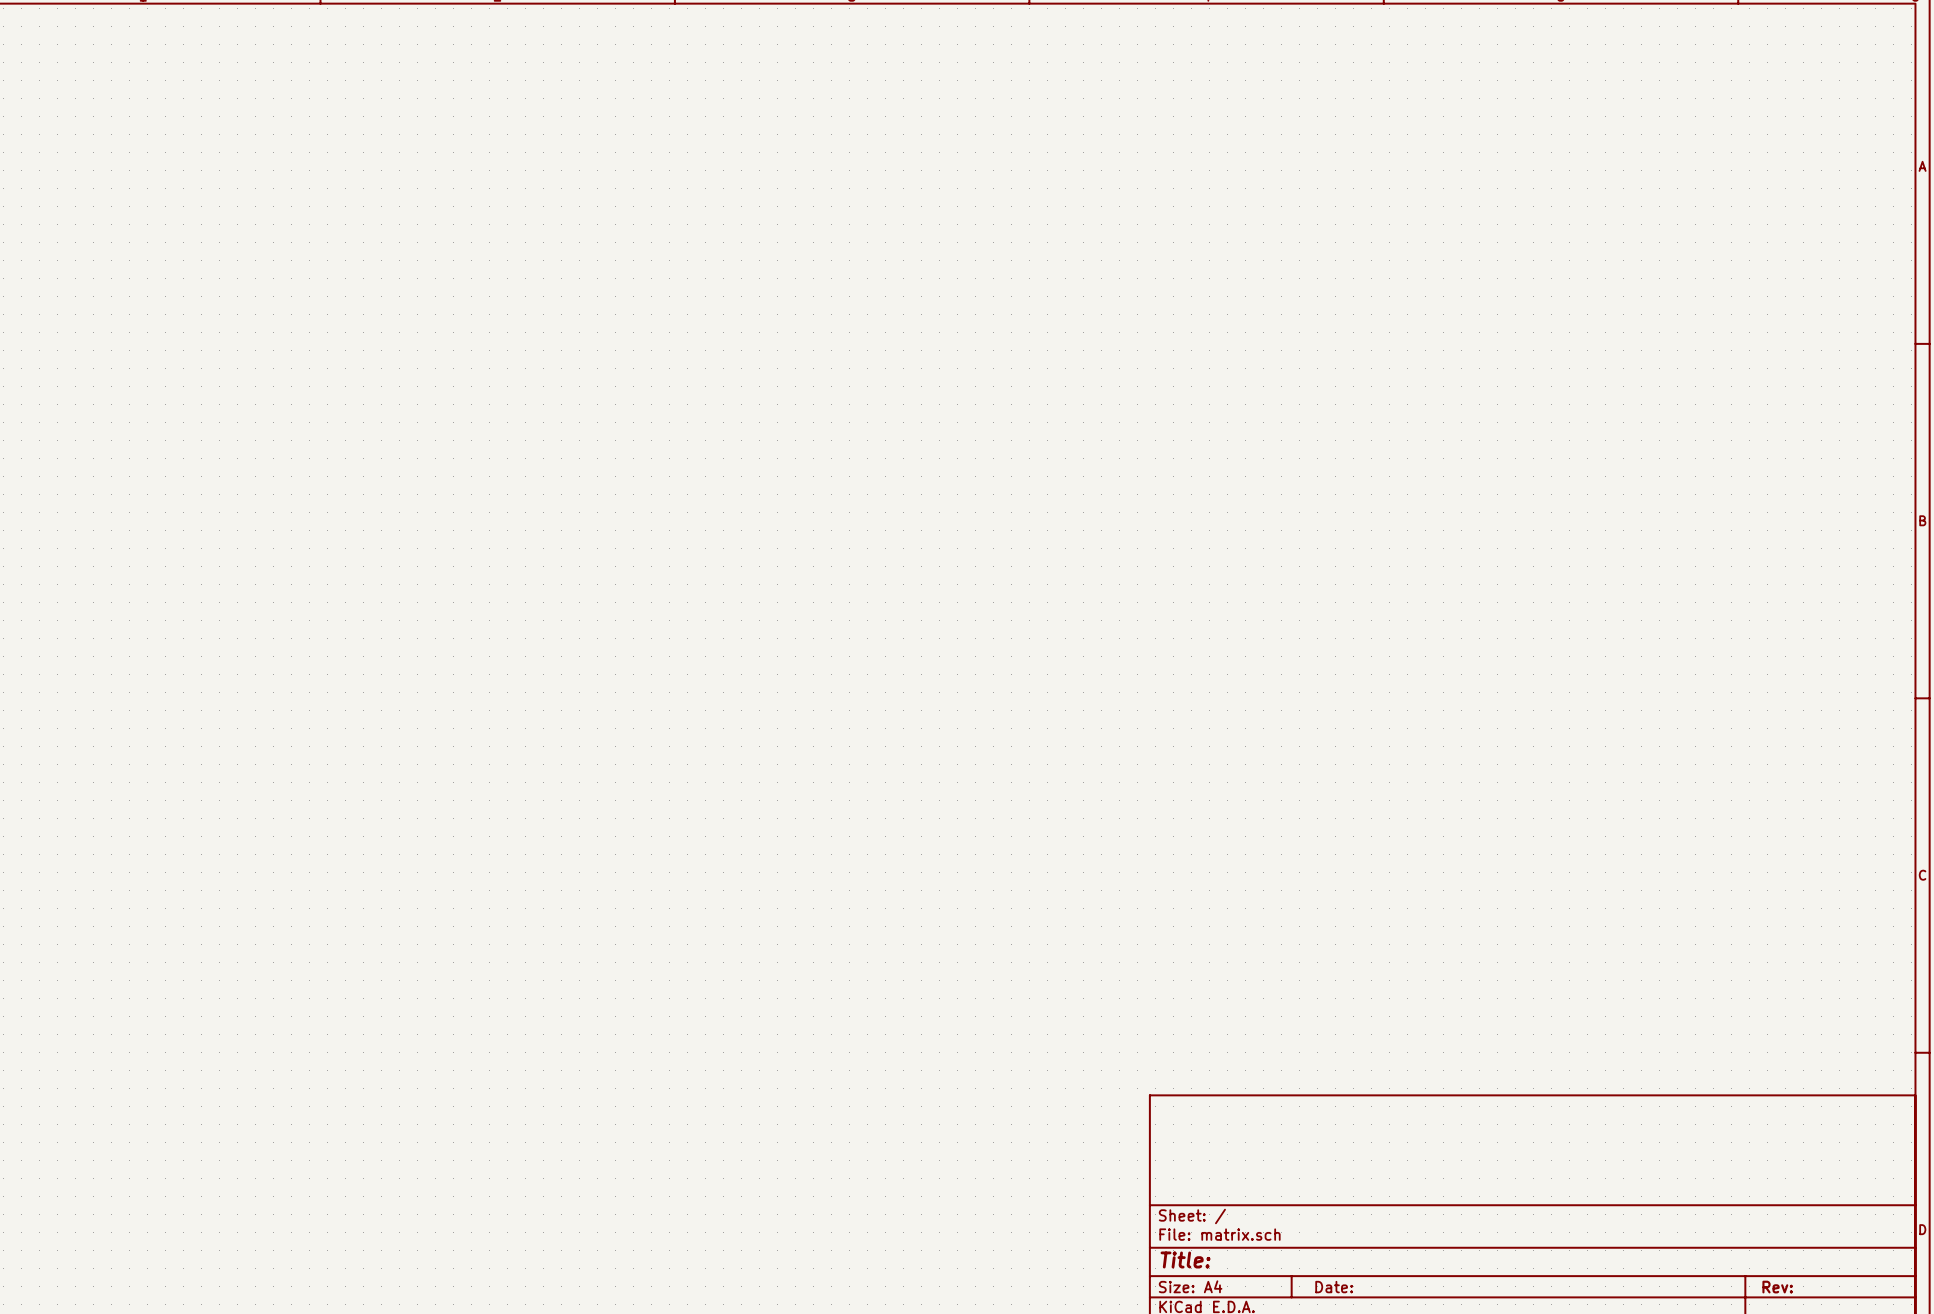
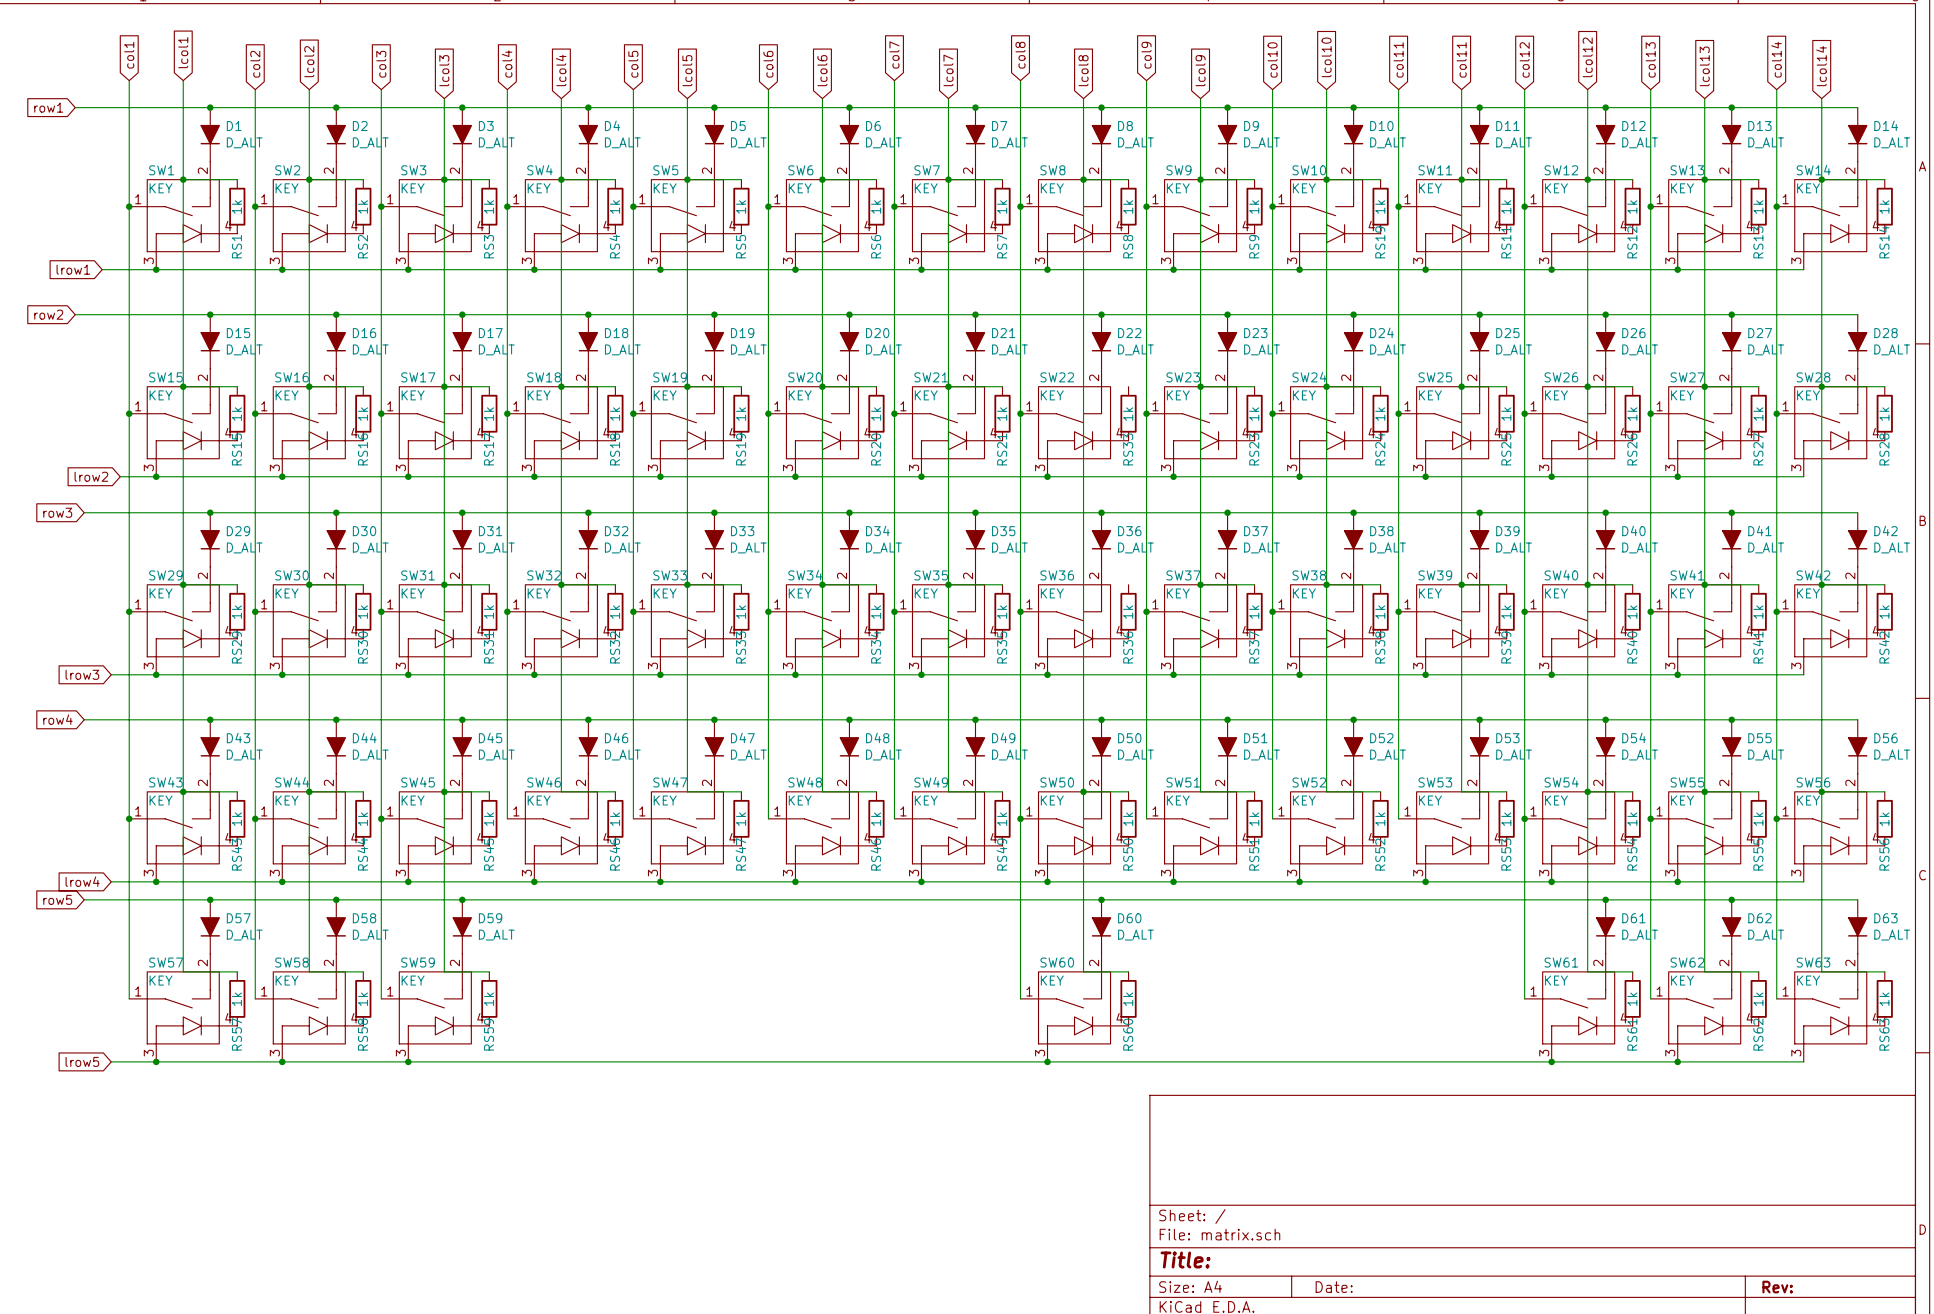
global label: none -> lcol1 (183, 52)
global label: none -> col7 (894, 54)
global label: none -> col1 (129, 55)
global label: none -> col8 (1020, 55)
global label: none -> col9 (1146, 55)
global label: none -> lcol10 (1326, 57)
global label: none -> lcol12 (1587, 57)
global label: none -> col10 (1272, 59)
global label: none -> col11 (1398, 59)
global label: none -> col11 (1461, 59)
global label: none -> col12 (1524, 59)
global label: none -> col13 (1650, 59)
global label: none -> col14 (1776, 59)
global label: none -> lcol2 (309, 61)
global label: none -> col2 (255, 64)
global label: none -> col3 (381, 64)
global label: none -> col4 (507, 64)
global label: none -> col5 (633, 64)
global label: none -> col6 (768, 64)
global label: none -> lcol13 (1704, 66)
global label: none -> lcol14 (1821, 66)
global label: none -> lcol3 (444, 70)
global label: none -> lcol4 (561, 70)
global label: none -> lcol5 (687, 70)
global label: none -> lcol6 (822, 70)
global label: none -> lcol7 (948, 70)
global label: none -> lcol8 (1083, 70)
global label: none -> lcol9 (1200, 70)
wire: none -> (129, 80) (129, 998)
wire: none -> (183, 80) (183, 971) (237, 971)
wire: none -> (894, 80) (894, 818)
wire: none -> (1020, 80) (1020, 998)
wire: none -> (1146, 80) (1146, 818)
wire: none -> (255, 89) (255, 998)
wire: none -> (309, 89) (309, 971) (363, 971)
wire: none -> (381, 89) (381, 998)
wire: none -> (507, 89) (507, 818)
wire: none -> (633, 89) (633, 818)
wire: none -> (768, 89) (768, 818)
wire: none -> (1272, 89) (1272, 818)
wire: none -> (1326, 89) (1326, 791) (1380, 791)
wire: none -> (1398, 89) (1398, 818)
wire: none -> (1461, 89) (1461, 791) (1506, 791)
wire: none -> (1524, 89) (1524, 998)
wire: none -> (1587, 89) (1587, 971) (1632, 971)
wire: none -> (1650, 89) (1650, 998)
wire: none -> (1776, 89) (1776, 998)
wire: none -> (444, 98) (444, 971) (489, 971)
wire: none -> (561, 98) (561, 791) (615, 791)
wire: none -> (687, 98) (687, 791) (741, 791)
wire: none -> (822, 98) (822, 791) (876, 791)
wire: none -> (948, 98) (948, 791) (1002, 791)
wire: none -> (1083, 98) (1083, 971) (1128, 971)
wire: none -> (1200, 98) (1200, 791) (1254, 791)
wire: none -> (1704, 98) (1704, 971) (1758, 971)
wire: none -> (1821, 98) (1821, 971) (1884, 971)
global label: none -> row1 (48, 107)
wire: none -> (75, 107) (1857, 107)
junction: none -> (210, 107)
junction: none -> (336, 107)
junction: none -> (462, 107)
junction: none -> (588, 107)
junction: none -> (714, 107)
junction: none -> (849, 107)
junction: none -> (975, 107)
junction: none -> (1101, 107)
junction: none -> (1227, 107)
junction: none -> (1353, 107)
junction: none -> (1479, 107)
junction: none -> (1605, 107)
junction: none -> (1731, 107)
D1: none -> D_ALT (210, 134)
D2: none -> D_ALT (336, 134)
D3: none -> D_ALT (462, 134)
D4: none -> D_ALT (588, 134)
D5: none -> D_ALT (714, 134)
D6: none -> D_ALT (849, 134)
D7: none -> D_ALT (975, 134)
D8: none -> D_ALT (1101, 134)
D9: none -> D_ALT (1227, 134)
D10: none -> D_ALT (1353, 134)
D11: none -> D_ALT (1479, 134)
D12: none -> D_ALT (1605, 134)
D13: none -> D_ALT (1731, 134)
D14: none -> D_ALT (1857, 134)
wire: none -> (183, 179) (237, 179)
junction: none -> (183, 179)
wire: none -> (309, 179) (363, 179)
junction: none -> (309, 179)
wire: none -> (444, 179) (489, 179)
junction: none -> (444, 179)
wire: none -> (561, 179) (615, 179)
junction: none -> (561, 179)
wire: none -> (687, 179) (741, 179)
junction: none -> (687, 179)
wire: none -> (822, 179) (876, 179)
junction: none -> (822, 179)
wire: none -> (948, 179) (1002, 179)
junction: none -> (948, 179)
wire: none -> (1083, 179) (1128, 179)
junction: none -> (1083, 179)
wire: none -> (1200, 179) (1254, 179)
junction: none -> (1200, 179)
wire: none -> (1326, 179) (1380, 179)
junction: none -> (1326, 179)
wire: none -> (1461, 179) (1506, 179)
junction: none -> (1461, 179)
wire: none -> (1587, 179) (1632, 179)
junction: none -> (1587, 179)
wire: none -> (1704, 179) (1758, 179)
junction: none -> (1704, 179)
wire: none -> (1821, 179) (1884, 179)
junction: none -> (1821, 179)
junction: none -> (129, 206)
RS1: none -> 1k (237, 206)
junction: none -> (255, 206)
RS2: none -> 1k (363, 206)
junction: none -> (381, 206)
RS3: none -> 1k (489, 206)
junction: none -> (507, 206)
RS4: none -> 1k (615, 206)
junction: none -> (633, 206)
RS5: none -> 1k (741, 206)
junction: none -> (768, 206)
RS6: none -> 1k (876, 206)
junction: none -> (894, 206)
RS7: none -> 1k (1002, 206)
junction: none -> (1020, 206)
RS8: none -> 1k (1128, 206)
junction: none -> (1146, 206)
RS9: none -> 1k (1254, 206)
junction: none -> (1272, 206)
RS19: none -> 1k (1380, 206)
junction: none -> (1398, 206)
RS11: none -> 1k (1506, 206)
junction: none -> (1524, 206)
RS12: none -> 1k (1632, 206)
junction: none -> (1650, 206)
RS13: none -> 1k (1758, 206)
junction: none -> (1776, 206)
RS14: none -> 1k (1884, 206)
SW1: none -> KEY (183, 215)
SW2: none -> KEY (309, 215)
SW3: none -> KEY (435, 215)
SW4: none -> KEY (561, 215)
SW5: none -> KEY (687, 215)
SW6: none -> KEY (822, 215)
SW7: none -> KEY (948, 215)
SW8: none -> KEY (1074, 215)
SW9: none -> KEY (1200, 215)
SW10: none -> KEY (1326, 215)
SW11: none -> KEY (1452, 215)
SW12: none -> KEY (1578, 215)
SW13: none -> KEY (1704, 215)
SW14: none -> KEY (1830, 215)
global label: none -> lrow1 (73, 269)
wire: none -> (102, 269) (1803, 269)
junction: none -> (156, 269)
junction: none -> (282, 269)
junction: none -> (408, 269)
junction: none -> (534, 269)
junction: none -> (660, 269)
junction: none -> (795, 269)
junction: none -> (921, 269)
junction: none -> (1047, 269)
junction: none -> (1173, 269)
junction: none -> (1299, 269)
junction: none -> (1425, 269)
junction: none -> (1551, 269)
junction: none -> (1677, 269)
global label: none -> row2 (48, 314)
wire: none -> (75, 314) (1857, 314)
junction: none -> (210, 314)
junction: none -> (336, 314)
junction: none -> (462, 314)
junction: none -> (588, 314)
junction: none -> (714, 314)
junction: none -> (849, 314)
junction: none -> (975, 314)
junction: none -> (1101, 314)
junction: none -> (1227, 314)
junction: none -> (1353, 314)
junction: none -> (1479, 314)
junction: none -> (1605, 314)
junction: none -> (1731, 314)
D15: none -> D_ALT (210, 341)
D16: none -> D_ALT (336, 341)
D17: none -> D_ALT (462, 341)
D18: none -> D_ALT (588, 341)
D19: none -> D_ALT (714, 341)
D20: none -> D_ALT (849, 341)
D21: none -> D_ALT (975, 341)
D22: none -> D_ALT (1101, 341)
D23: none -> D_ALT (1227, 341)
D24: none -> D_ALT (1353, 341)
D25: none -> D_ALT (1479, 341)
D26: none -> D_ALT (1605, 341)
D27: none -> D_ALT (1731, 341)
D28: none -> D_ALT (1857, 341)
wire: none -> (183, 386) (237, 386)
junction: none -> (183, 386)
wire: none -> (309, 386) (363, 386)
junction: none -> (309, 386)
wire: none -> (444, 386) (489, 386)
junction: none -> (444, 386)
wire: none -> (561, 386) (615, 386)
junction: none -> (561, 386)
wire: none -> (687, 386) (741, 386)
junction: none -> (687, 386)
wire: none -> (822, 386) (876, 386)
junction: none -> (822, 386)
wire: none -> (948, 386) (1002, 386)
junction: none -> (948, 386)
wire: none -> (1200, 386) (1254, 386)
junction: none -> (1200, 386)
wire: none -> (1326, 386) (1380, 386)
junction: none -> (1326, 386)
wire: none -> (1461, 386) (1506, 386)
junction: none -> (1461, 386)
wire: none -> (1587, 386) (1632, 386)
junction: none -> (1587, 386)
wire: none -> (1704, 386) (1758, 386)
junction: none -> (1704, 386)
wire: none -> (1821, 386) (1884, 386)
junction: none -> (1821, 386)
junction: none -> (129, 413)
RS15: none -> 1k (237, 413)
junction: none -> (255, 413)
RS16: none -> 1k (363, 413)
junction: none -> (381, 413)
RS17: none -> 1k (489, 413)
junction: none -> (507, 413)
RS18: none -> 1k (615, 413)
junction: none -> (633, 413)
RS19: none -> 1k (741, 413)
junction: none -> (768, 413)
RS20: none -> 1k (876, 413)
junction: none -> (894, 413)
RS21: none -> 1k (1002, 413)
junction: none -> (1020, 413)
RS33: none -> 1k (1128, 413)
junction: none -> (1146, 413)
RS23: none -> 1k (1254, 413)
junction: none -> (1272, 413)
RS24: none -> 1k (1380, 413)
junction: none -> (1398, 413)
RS25: none -> 1k (1506, 413)
junction: none -> (1524, 413)
RS26: none -> 1k (1632, 413)
junction: none -> (1650, 413)
RS27: none -> 1k (1758, 413)
junction: none -> (1776, 413)
RS28: none -> 1k (1884, 413)
SW15: none -> KEY (183, 422)
SW16: none -> KEY (309, 422)
SW17: none -> KEY (435, 422)
SW18: none -> KEY (561, 422)
SW19: none -> KEY (687, 422)
SW20: none -> KEY (822, 422)
SW21: none -> KEY (948, 422)
SW22: none -> KEY (1074, 422)
SW23: none -> KEY (1200, 422)
SW24: none -> KEY (1326, 422)
SW25: none -> KEY (1452, 422)
SW26: none -> KEY (1578, 422)
SW27: none -> KEY (1704, 422)
SW28: none -> KEY (1830, 422)
global label: none -> lrow2 (91, 476)
wire: none -> (120, 476) (1803, 476)
junction: none -> (156, 476)
junction: none -> (282, 476)
junction: none -> (408, 476)
junction: none -> (534, 476)
junction: none -> (660, 476)
junction: none -> (795, 476)
junction: none -> (921, 476)
junction: none -> (1047, 476)
junction: none -> (1173, 476)
junction: none -> (1299, 476)
junction: none -> (1425, 476)
junction: none -> (1551, 476)
junction: none -> (1677, 476)
global label: none -> row3 (57, 512)
wire: none -> (84, 512) (1857, 512)
junction: none -> (210, 512)
junction: none -> (336, 512)
junction: none -> (462, 512)
junction: none -> (588, 512)
junction: none -> (714, 512)
junction: none -> (849, 512)
junction: none -> (975, 512)
junction: none -> (1101, 512)
junction: none -> (1227, 512)
junction: none -> (1353, 512)
junction: none -> (1479, 512)
junction: none -> (1605, 512)
junction: none -> (1731, 512)
D29: none -> D_ALT (210, 539)
D30: none -> D_ALT (336, 539)
D31: none -> D_ALT (462, 539)
D32: none -> D_ALT (588, 539)
D33: none -> D_ALT (714, 539)
D34: none -> D_ALT (849, 539)
D35: none -> D_ALT (975, 539)
D36: none -> D_ALT (1101, 539)
D37: none -> D_ALT (1227, 539)
D38: none -> D_ALT (1353, 539)
D39: none -> D_ALT (1479, 539)
D40: none -> D_ALT (1605, 539)
D41: none -> D_ALT (1731, 539)
D42: none -> D_ALT (1857, 539)
wire: none -> (183, 584) (237, 584)
junction: none -> (183, 584)
wire: none -> (309, 584) (363, 584)
junction: none -> (309, 584)
wire: none -> (444, 584) (489, 584)
junction: none -> (444, 584)
wire: none -> (561, 584) (615, 584)
junction: none -> (561, 584)
wire: none -> (687, 584) (741, 584)
junction: none -> (687, 584)
wire: none -> (822, 584) (876, 584)
junction: none -> (822, 584)
wire: none -> (948, 584) (1002, 584)
junction: none -> (948, 584)
wire: none -> (1200, 584) (1254, 584)
junction: none -> (1200, 584)
wire: none -> (1326, 584) (1380, 584)
junction: none -> (1326, 584)
wire: none -> (1461, 584) (1506, 584)
junction: none -> (1461, 584)
wire: none -> (1587, 584) (1632, 584)
junction: none -> (1587, 584)
wire: none -> (1704, 584) (1758, 584)
junction: none -> (1704, 584)
wire: none -> (1821, 584) (1884, 584)
junction: none -> (1821, 584)
junction: none -> (129, 611)
RS29: none -> 1k (237, 611)
junction: none -> (255, 611)
RS30: none -> 1k (363, 611)
junction: none -> (381, 611)
RS31: none -> 1k (489, 611)
junction: none -> (507, 611)
RS32: none -> 1k (615, 611)
junction: none -> (633, 611)
RS33: none -> 1k (741, 611)
junction: none -> (768, 611)
RS34: none -> 1k (876, 611)
junction: none -> (894, 611)
RS35: none -> 1k (1002, 611)
junction: none -> (1020, 611)
RS36: none -> 1k (1128, 611)
junction: none -> (1146, 611)
RS37: none -> 1k (1254, 611)
junction: none -> (1272, 611)
RS38: none -> 1k (1380, 611)
junction: none -> (1398, 611)
RS39: none -> 1k (1506, 611)
junction: none -> (1524, 611)
RS40: none -> 1k (1632, 611)
junction: none -> (1650, 611)
RS41: none -> 1k (1758, 611)
junction: none -> (1776, 611)
RS42: none -> 1k (1884, 611)
SW29: none -> KEY (183, 620)
SW30: none -> KEY (309, 620)
SW31: none -> KEY (435, 620)
SW32: none -> KEY (561, 620)
SW33: none -> KEY (687, 620)
SW34: none -> KEY (822, 620)
SW35: none -> KEY (948, 620)
SW36: none -> KEY (1074, 620)
SW37: none -> KEY (1200, 620)
SW38: none -> KEY (1326, 620)
SW39: none -> KEY (1452, 620)
SW40: none -> KEY (1578, 620)
SW41: none -> KEY (1704, 620)
SW42: none -> KEY (1830, 620)
global label: none -> lrow3 (82, 674)
wire: none -> (111, 674) (1803, 674)
junction: none -> (156, 674)
junction: none -> (282, 674)
junction: none -> (408, 674)
junction: none -> (534, 674)
junction: none -> (660, 674)
junction: none -> (795, 674)
junction: none -> (921, 674)
junction: none -> (1047, 674)
junction: none -> (1173, 674)
junction: none -> (1299, 674)
junction: none -> (1425, 674)
junction: none -> (1551, 674)
junction: none -> (1677, 674)
global label: none -> row4 (57, 719)
wire: none -> (84, 719) (1857, 719)
junction: none -> (210, 719)
junction: none -> (336, 719)
junction: none -> (462, 719)
junction: none -> (588, 719)
junction: none -> (714, 719)
junction: none -> (849, 719)
junction: none -> (975, 719)
junction: none -> (1101, 719)
junction: none -> (1227, 719)
junction: none -> (1353, 719)
junction: none -> (1479, 719)
junction: none -> (1605, 719)
junction: none -> (1731, 719)
D43: none -> D_ALT (210, 746)
D44: none -> D_ALT (336, 746)
D45: none -> D_ALT (462, 746)
D46: none -> D_ALT (588, 746)
D47: none -> D_ALT (714, 746)
D48: none -> D_ALT (849, 746)
D49: none -> D_ALT (975, 746)
D50: none -> D_ALT (1101, 746)
D51: none -> D_ALT (1227, 746)
D52: none -> D_ALT (1353, 746)
D53: none -> D_ALT (1479, 746)
D54: none -> D_ALT (1605, 746)
D55: none -> D_ALT (1731, 746)
D56: none -> D_ALT (1857, 746)
wire: none -> (183, 791) (237, 791)
junction: none -> (183, 791)
wire: none -> (309, 791) (363, 791)
junction: none -> (309, 791)
wire: none -> (444, 791) (489, 791)
junction: none -> (444, 791)
wire: none -> (1083, 791) (1128, 791)
junction: none -> (1083, 791)
wire: none -> (1587, 791) (1632, 791)
junction: none -> (1587, 791)
wire: none -> (1704, 791) (1758, 791)
junction: none -> (1704, 791)
wire: none -> (1821, 791) (1884, 791)
junction: none -> (1821, 791)
junction: none -> (129, 818)
RS43: none -> 1k (237, 818)
junction: none -> (255, 818)
RS44: none -> 1k (363, 818)
junction: none -> (381, 818)
RS45: none -> 1k (489, 818)
RS46: none -> 1k (615, 818)
RS47: none -> 1k (741, 818)
RS46: none -> 1k (876, 818)
RS49: none -> 1k (1002, 818)
junction: none -> (1020, 818)
RS50: none -> 1k (1128, 818)
RS51: none -> 1k (1254, 818)
RS52: none -> 1k (1380, 818)
RS53: none -> 1k (1506, 818)
junction: none -> (1524, 818)
RS54: none -> 1k (1632, 818)
junction: none -> (1650, 818)
RS55: none -> 1k (1758, 818)
junction: none -> (1776, 818)
RS56: none -> 1k (1884, 818)
SW43: none -> KEY (183, 827)
SW44: none -> KEY (309, 827)
SW45: none -> KEY (435, 827)
SW46: none -> KEY (561, 827)
SW47: none -> KEY (687, 827)
SW48: none -> KEY (822, 827)
SW49: none -> KEY (948, 827)
SW50: none -> KEY (1074, 827)
SW51: none -> KEY (1200, 827)
SW52: none -> KEY (1326, 827)
SW53: none -> KEY (1452, 827)
SW54: none -> KEY (1578, 827)
SW55: none -> KEY (1704, 827)
SW56: none -> KEY (1830, 827)
global label: none -> lrow4 (82, 881)
wire: none -> (111, 881) (1803, 881)
junction: none -> (156, 881)
junction: none -> (282, 881)
junction: none -> (408, 881)
junction: none -> (534, 881)
junction: none -> (660, 881)
junction: none -> (795, 881)
junction: none -> (921, 881)
junction: none -> (1047, 881)
junction: none -> (1173, 881)
junction: none -> (1299, 881)
junction: none -> (1425, 881)
junction: none -> (1551, 881)
junction: none -> (1677, 881)
global label: none -> row5 (57, 899)
wire: none -> (84, 899) (1857, 899)
junction: none -> (210, 899)
junction: none -> (336, 899)
junction: none -> (462, 899)
junction: none -> (1101, 899)
junction: none -> (1605, 899)
junction: none -> (1731, 899)
D57: none -> D_ALT (210, 926)
D58: none -> D_ALT (336, 926)
D59: none -> D_ALT (462, 926)
D60: none -> D_ALT (1101, 926)
D61: none -> D_ALT (1605, 926)
D62: none -> D_ALT (1731, 926)
D63: none -> D_ALT (1857, 926)
RS57: none -> 1k (237, 998)
RS58: none -> 1k (363, 998)
RS59: none -> 1k (489, 998)
RS60: none -> 1k (1128, 998)
RS61: none -> 1k (1632, 998)
RS62: none -> 1k (1758, 998)
RS63: none -> 1k (1884, 998)
SW57: none -> KEY (183, 1007)
SW58: none -> KEY (309, 1007)
SW59: none -> KEY (435, 1007)
SW60: none -> KEY (1074, 1007)
SW61: none -> KEY (1578, 1007)
SW62: none -> KEY (1704, 1007)
SW63: none -> KEY (1830, 1007)
global label: none -> lrow5 (82, 1061)
wire: none -> (111, 1061) (1803, 1061)
junction: none -> (156, 1061)
junction: none -> (282, 1061)
junction: none -> (408, 1061)
junction: none -> (1047, 1061)
junction: none -> (1551, 1061)
junction: none -> (1677, 1061)

